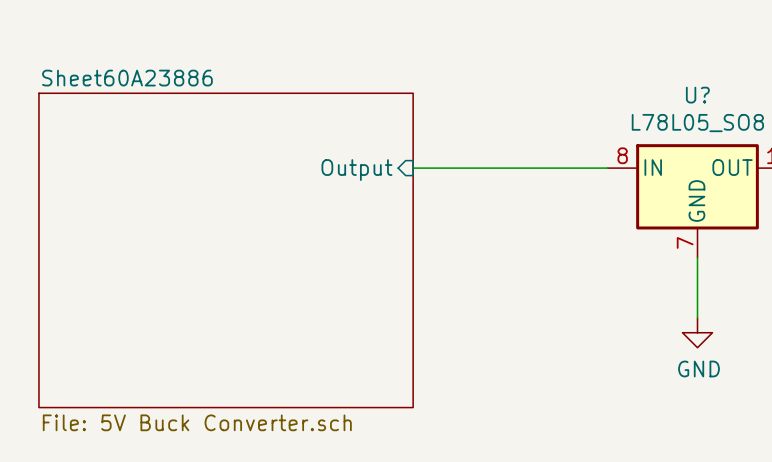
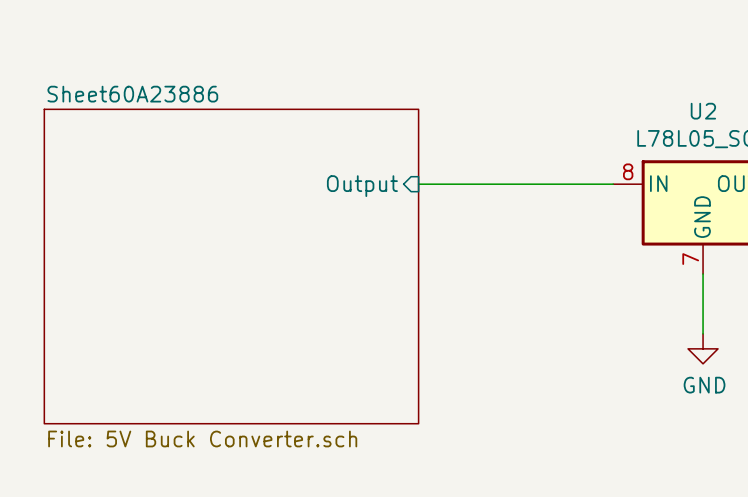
U? name: U? (697, 95) -> U2 (703, 111)

